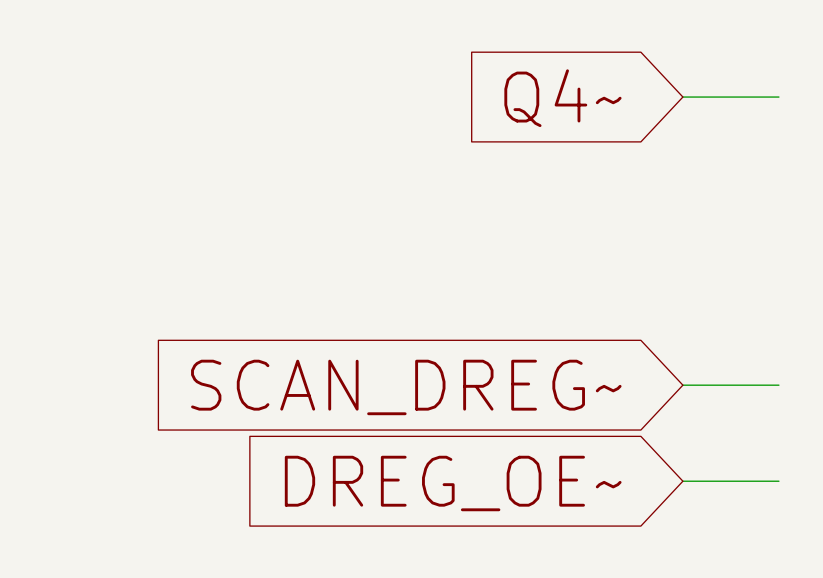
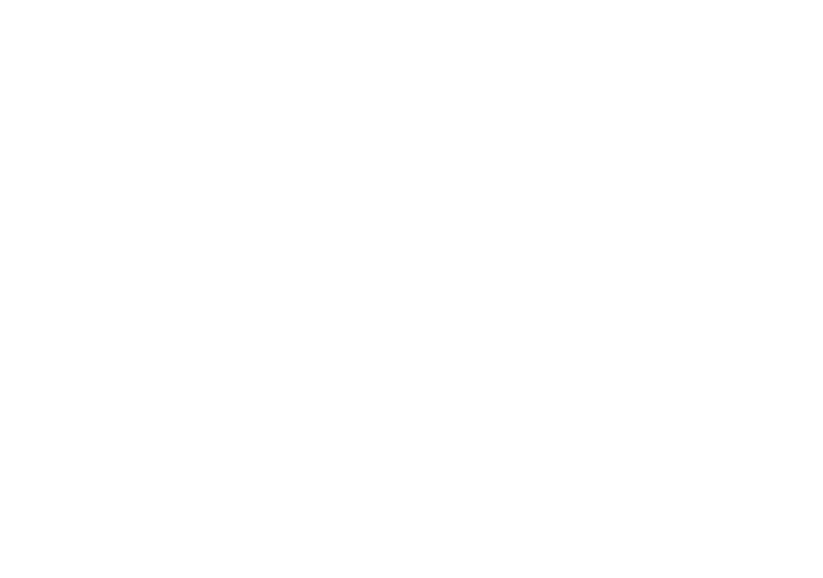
wire: (682, 97) (778, 97) -> none
global label: Q4~ (562, 98) -> none
wire: (682, 385) (778, 385) -> none
global label: SCAN_DREG~ (406, 387) -> none
wire: (682, 481) (778, 481) -> none
global label: DREG_OE~ (453, 483) -> none

